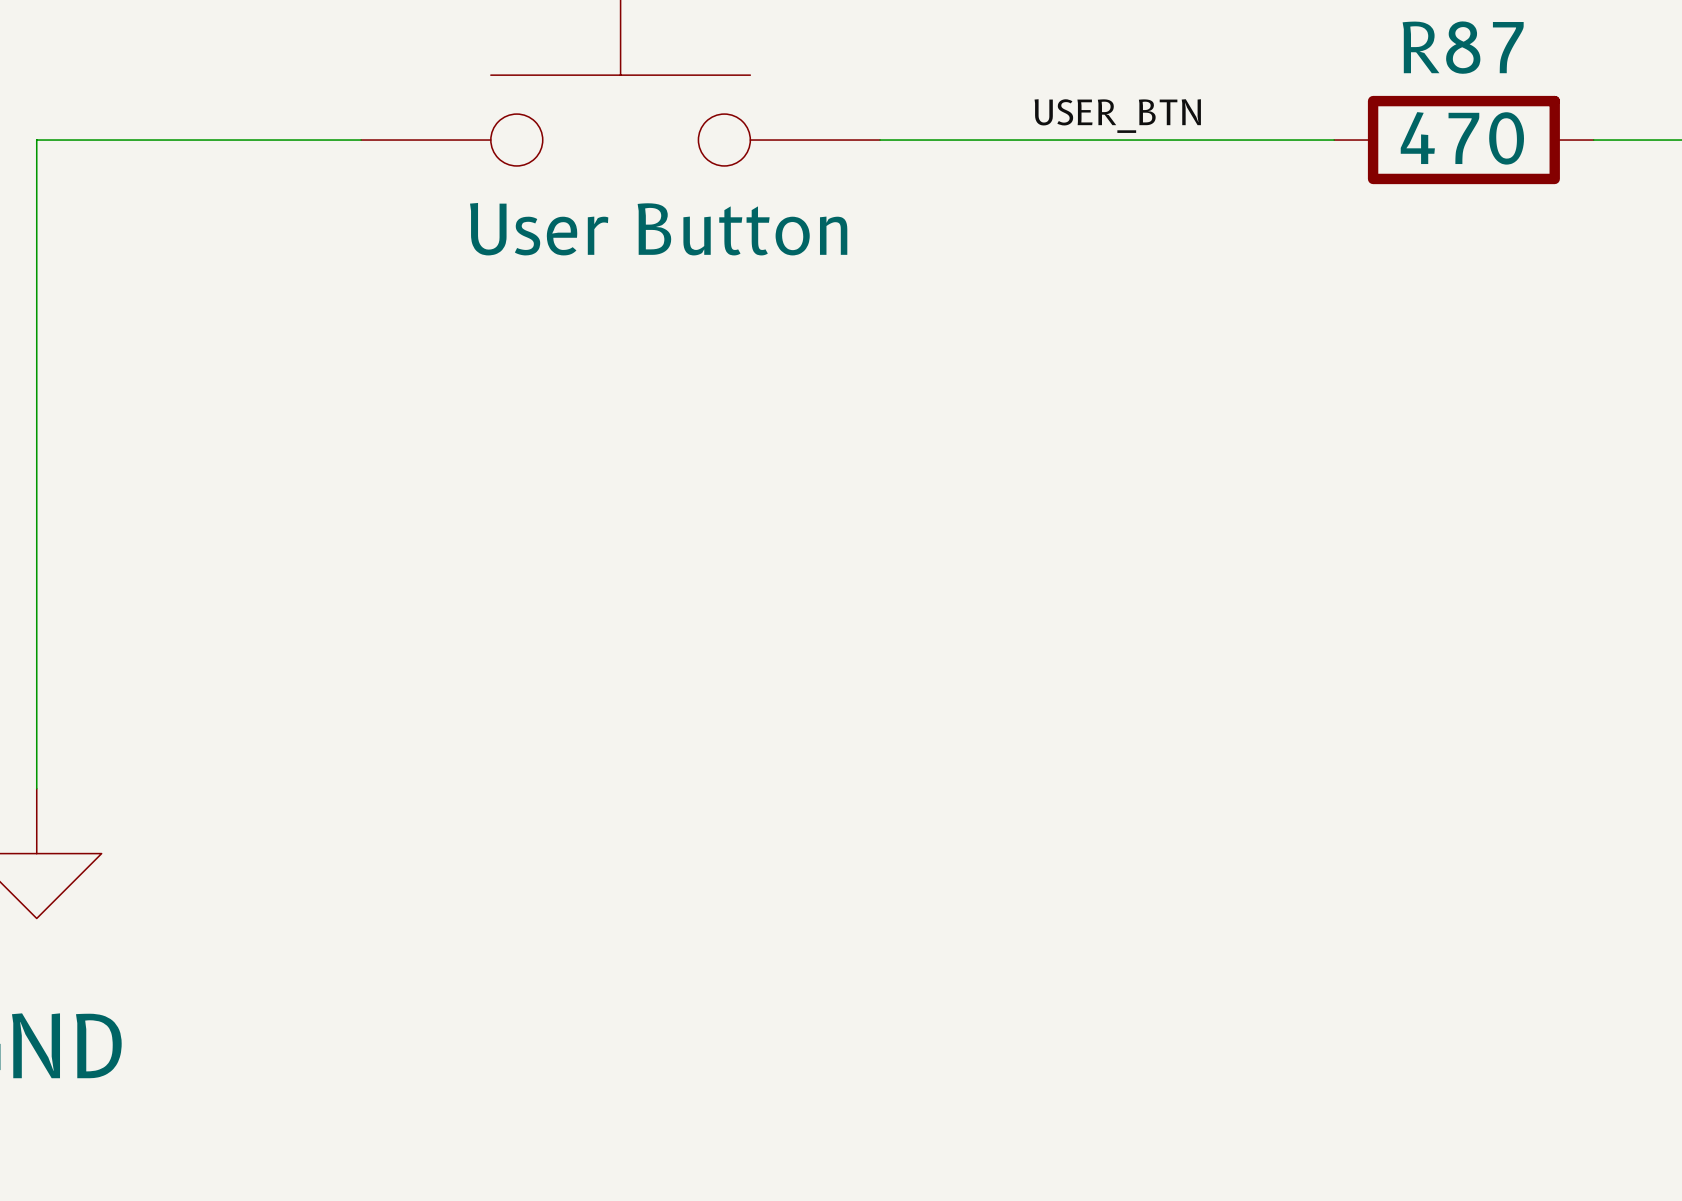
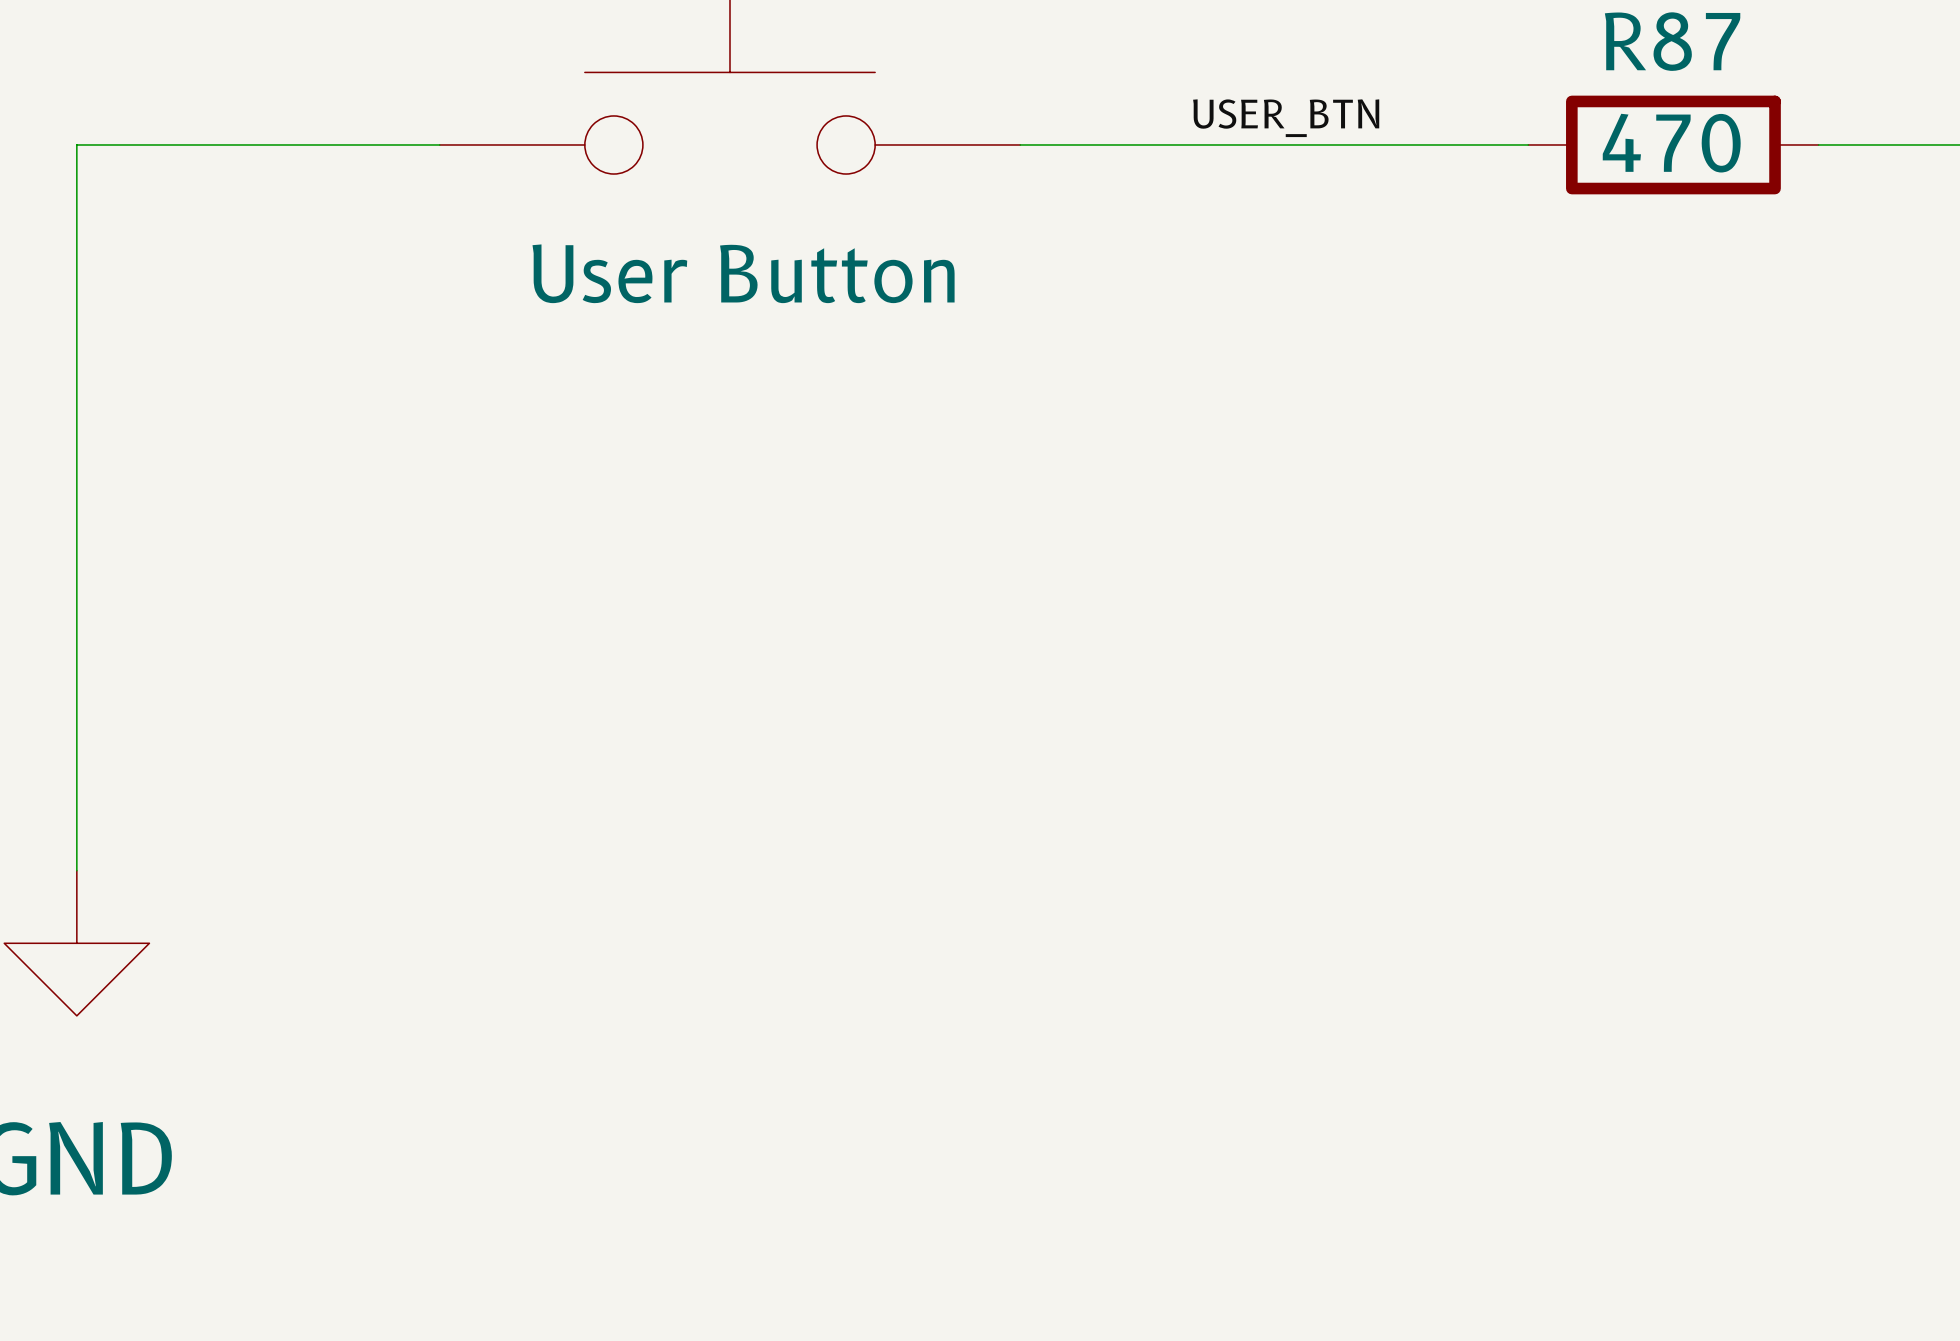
part value position: User Button (658, 229) -> User Button (743, 273)

